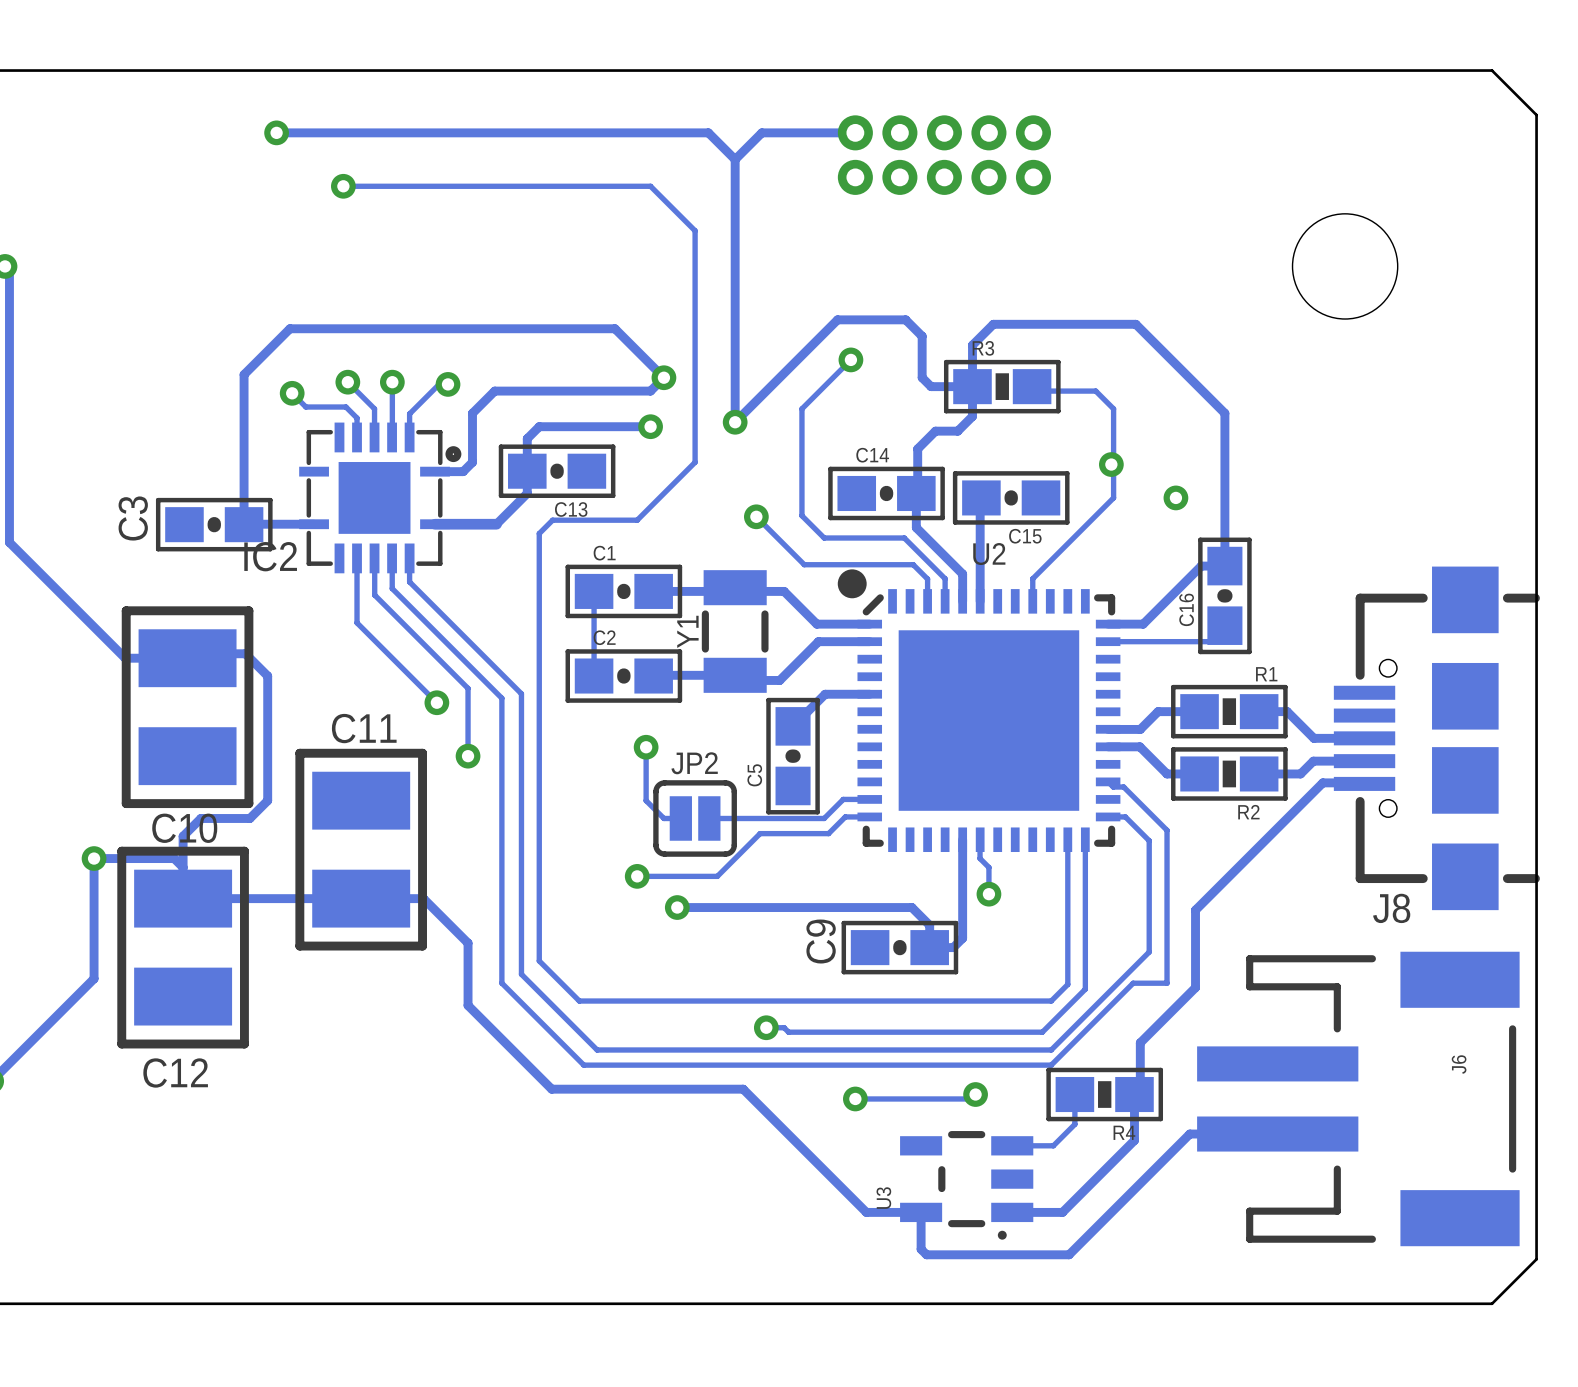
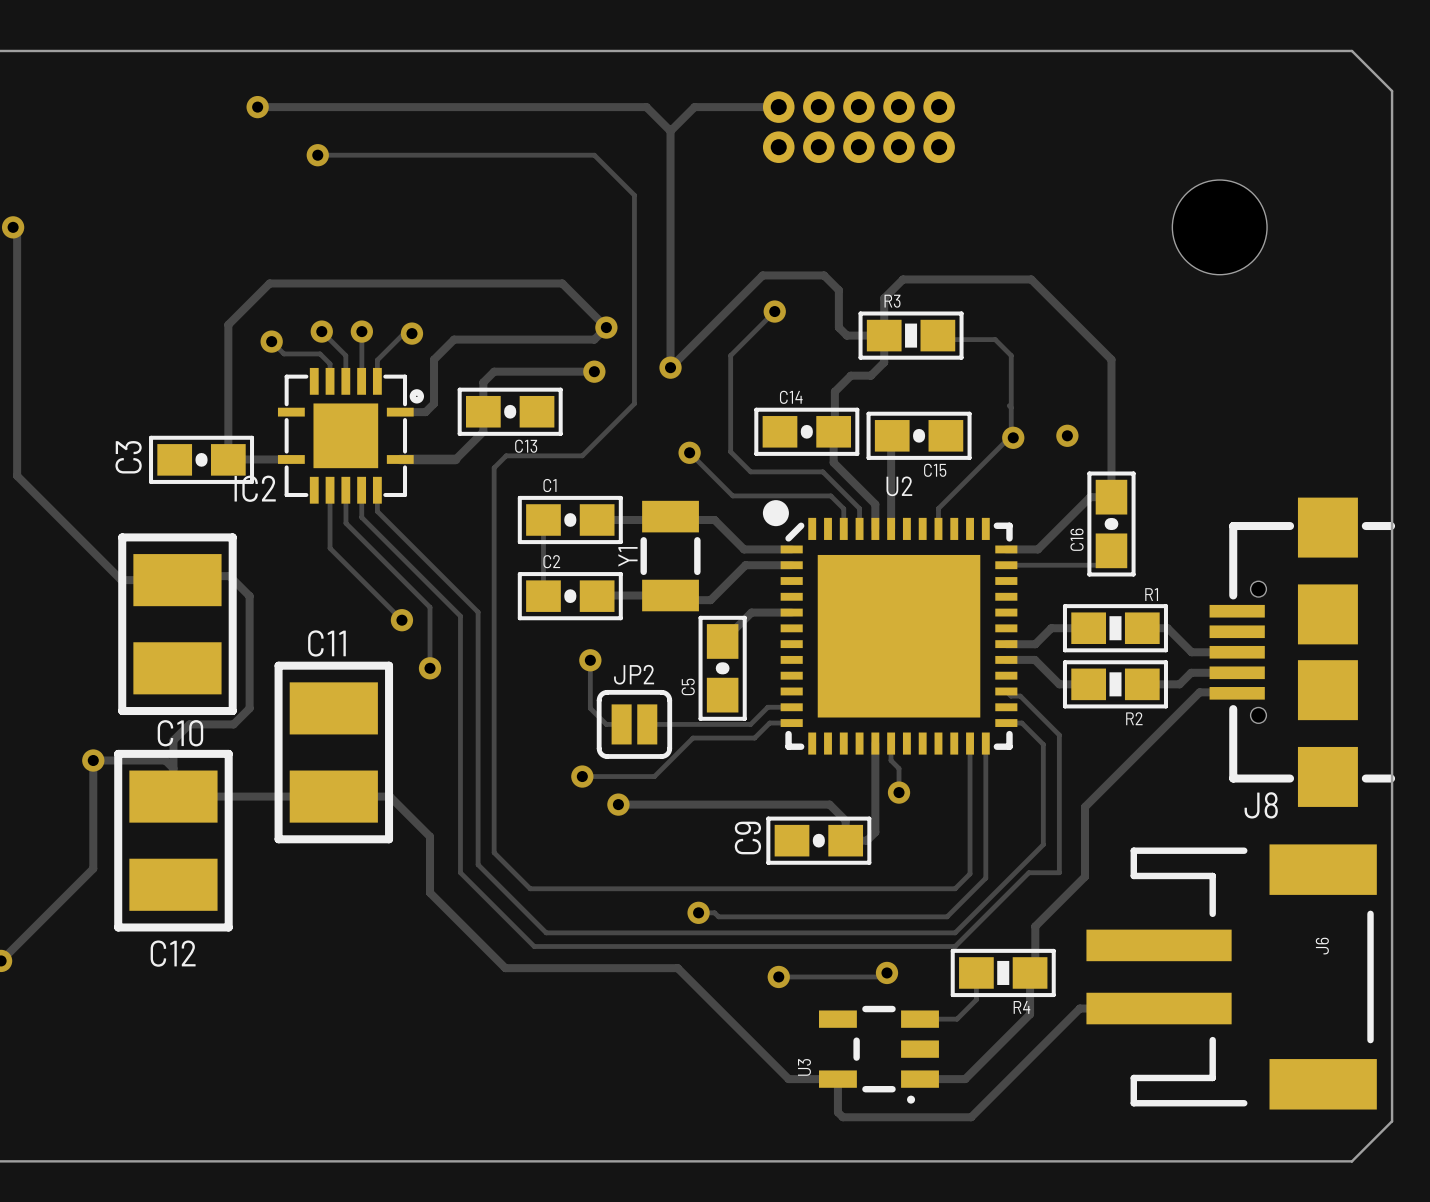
via position: (1111, 464) -> (1013, 437)

